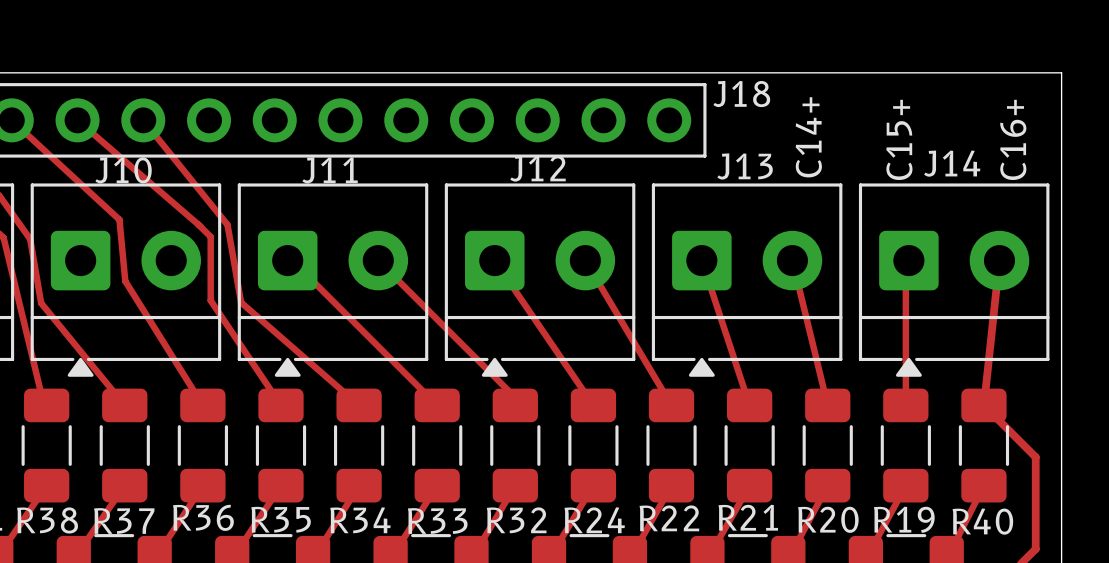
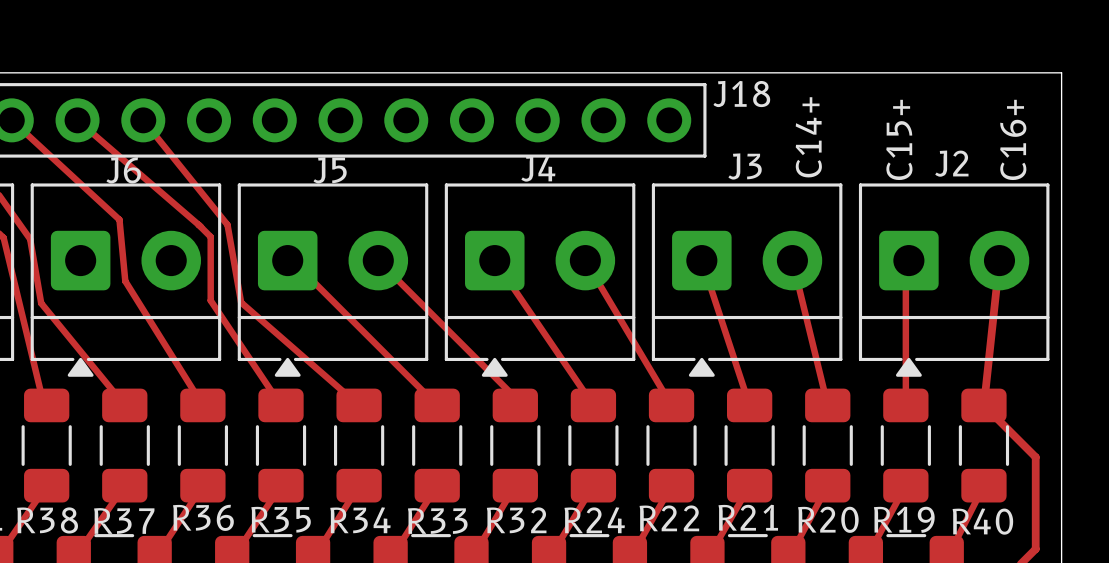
J14 name: J14 (952, 163) -> J2 (951, 163)
J13 name: J13 (745, 166) -> J3 (745, 166)
J12 name: J12 (537, 168) -> J4 (538, 168)
J10 name: J10 (123, 170) -> J6 (123, 170)
J11 name: J11 (330, 170) -> J5 (330, 170)

